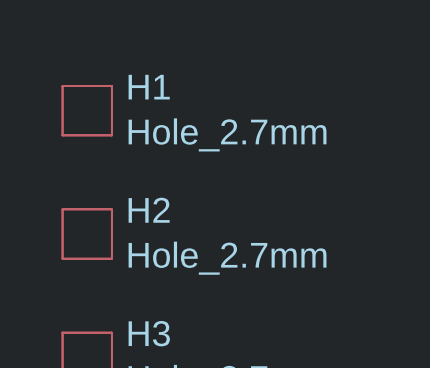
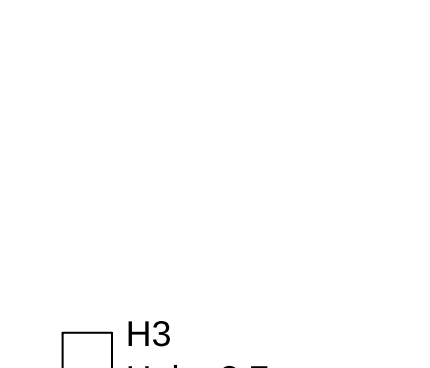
H1: Hole_2.7mm (87, 110) -> none
H2: Hole_2.7mm (87, 234) -> none

